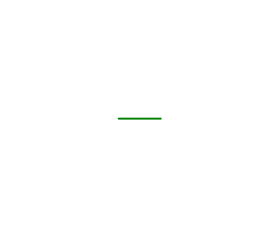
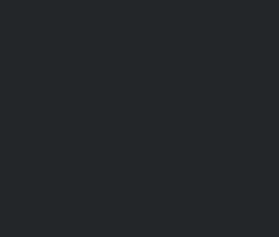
wire: (118, 118) (160, 118) -> none

